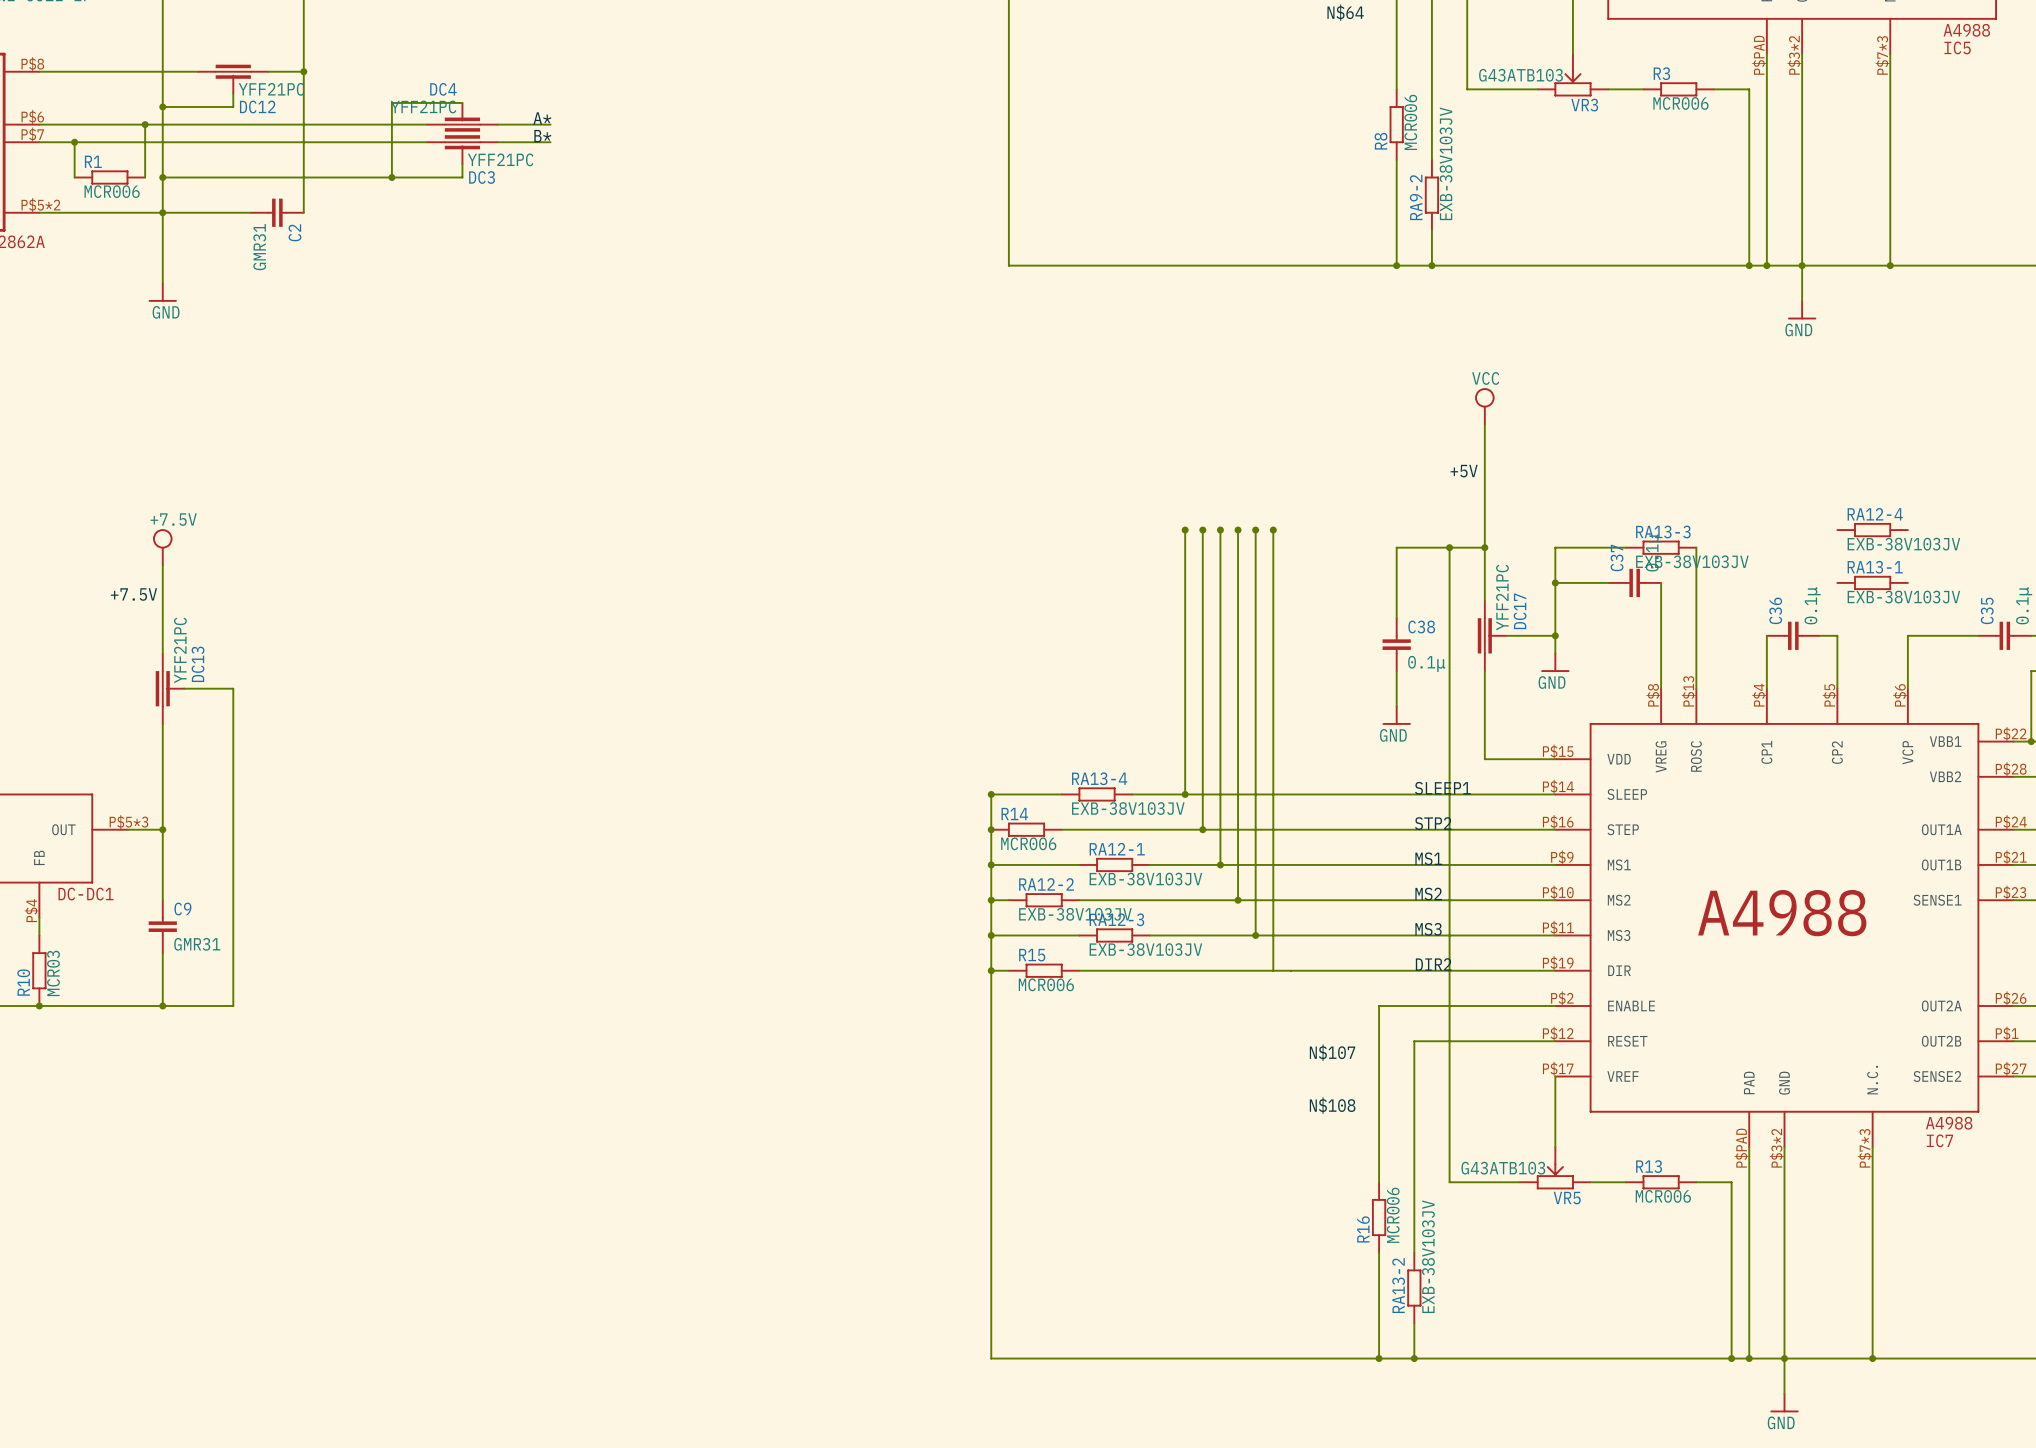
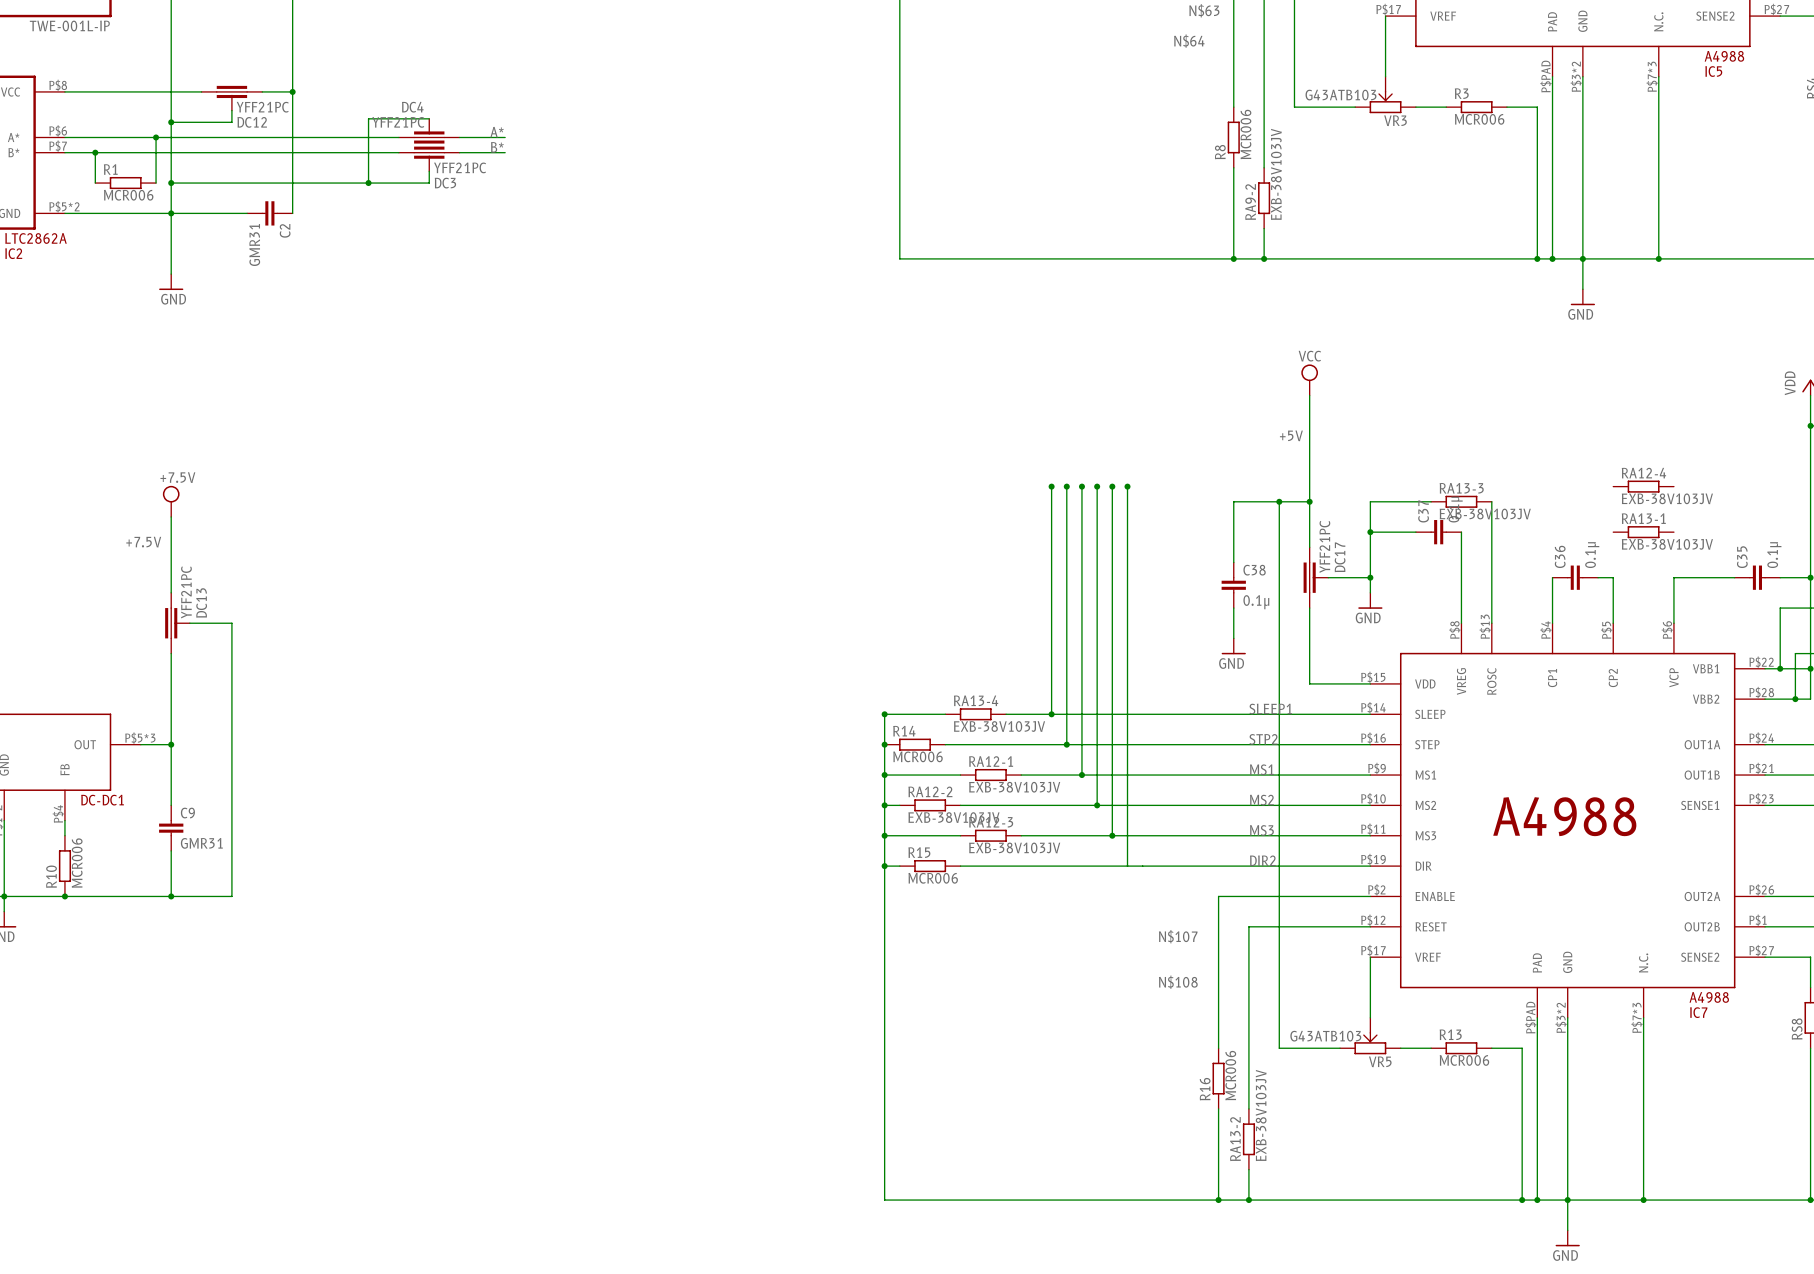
R10 value: MCR03 (53, 973) -> MCR006 (77, 863)

